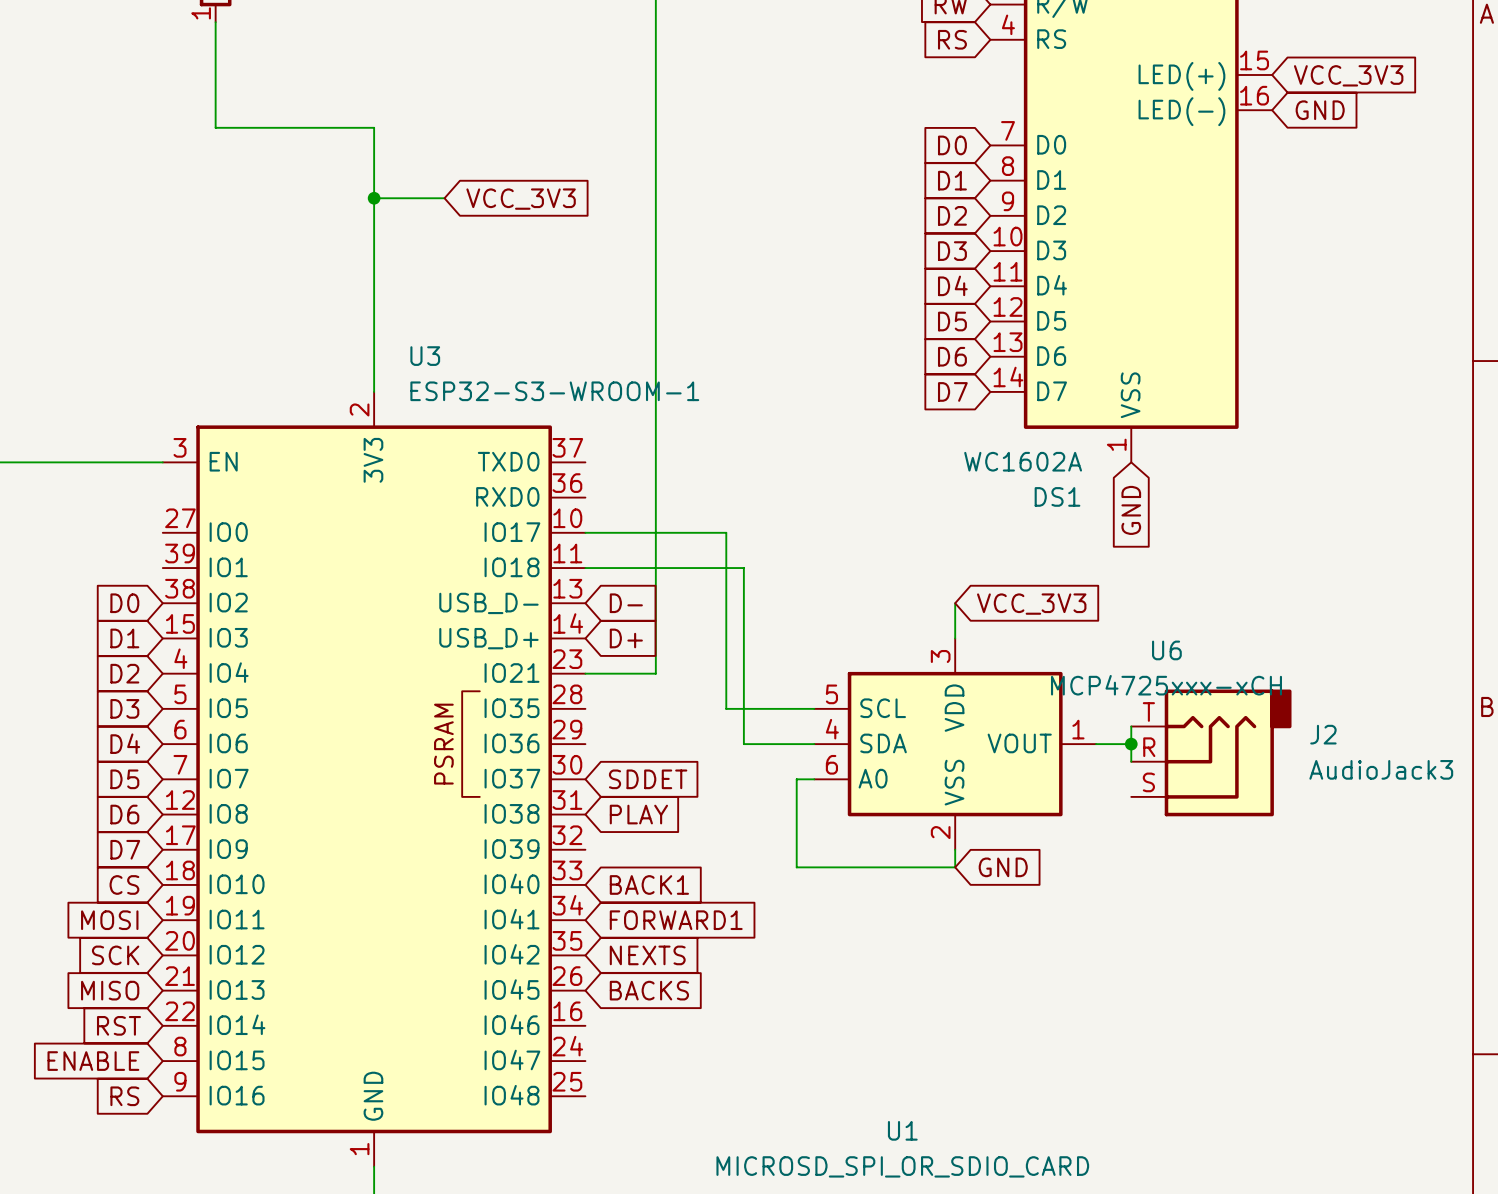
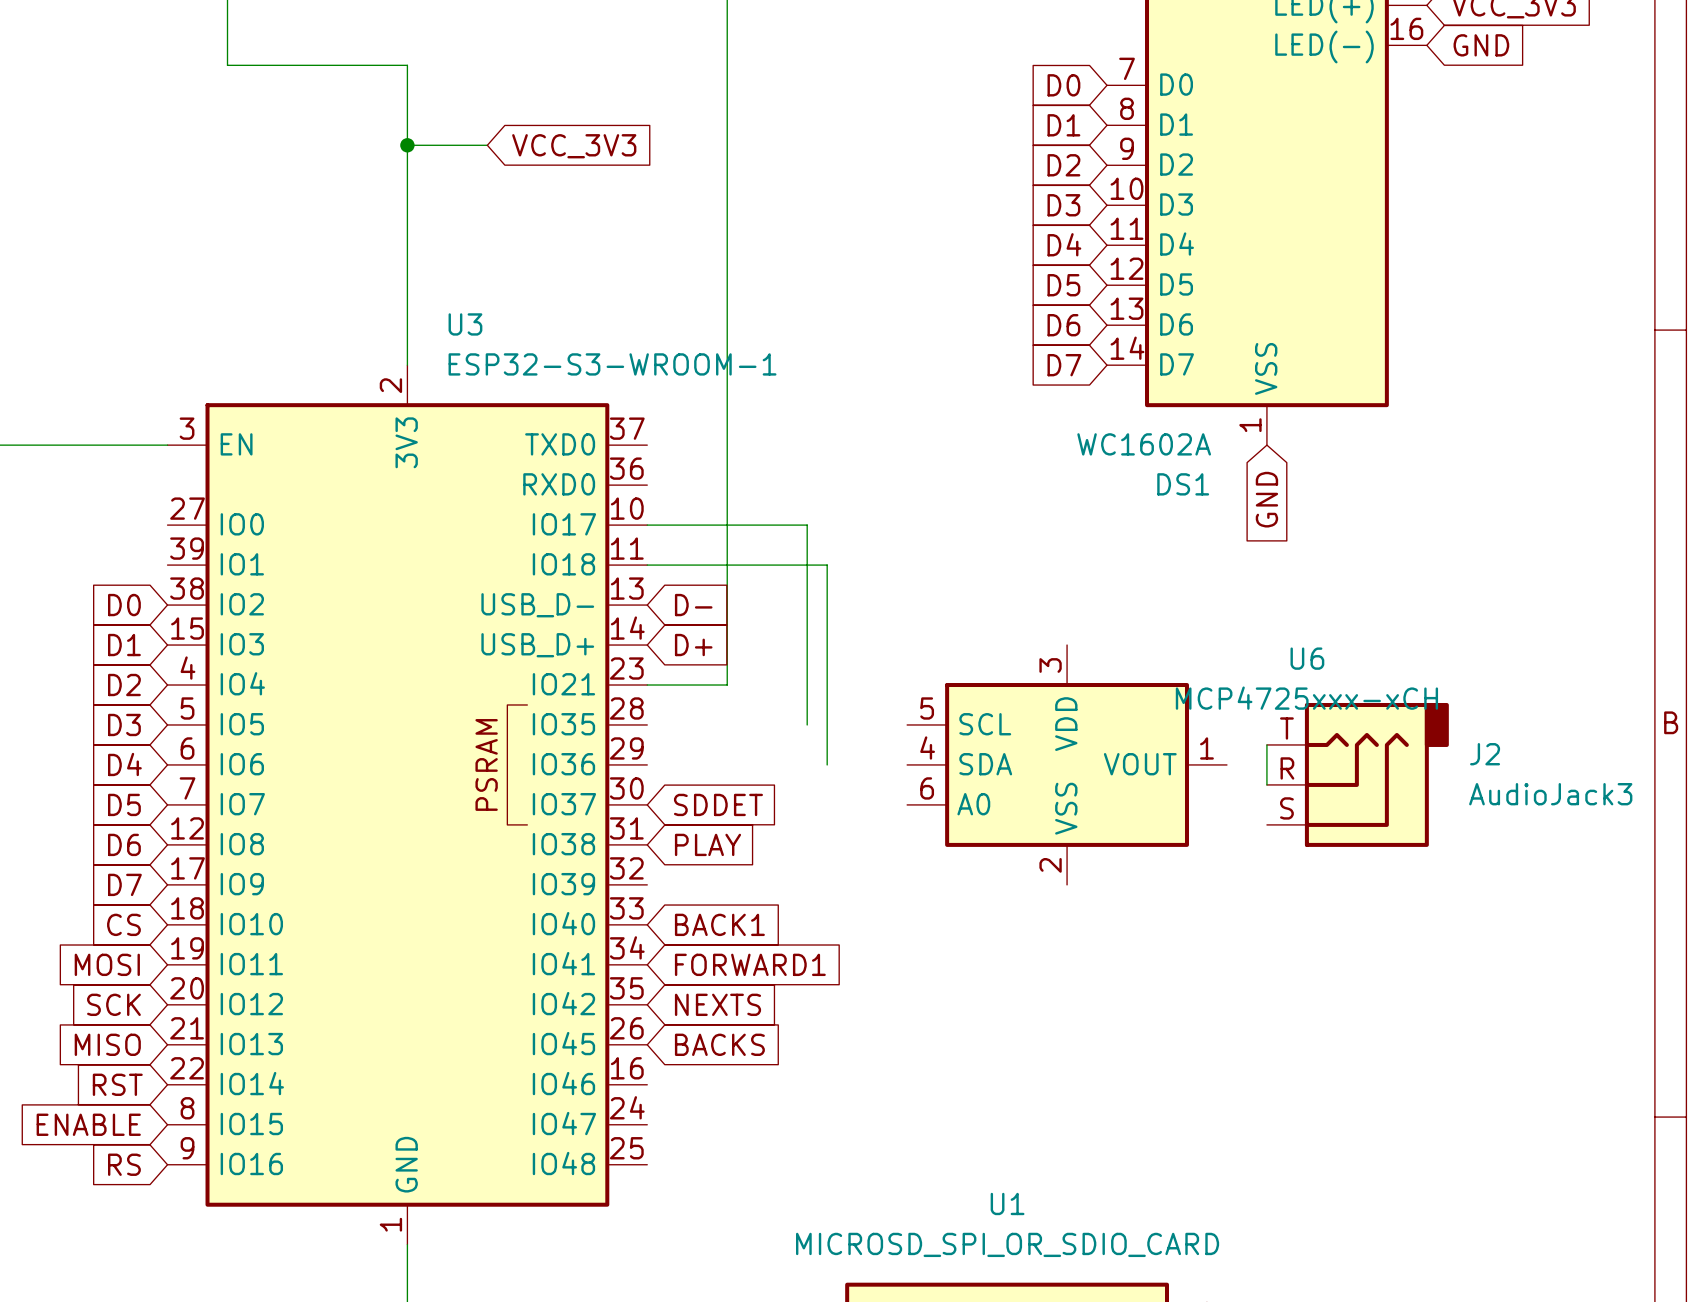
wire: (955, 603) (955, 638) -> none
global label: VCC_3V3 (1031, 604) -> none
wire: (726, 708) (814, 708) -> none
wire: (743, 744) (814, 744) -> none
wire: (1096, 744) (1131, 744) -> none
junction: (1131, 744) -> none
wire: (814, 779) (796, 779) (796, 867) (955, 867) (955, 849) -> none
global label: GND (1003, 867) -> none

